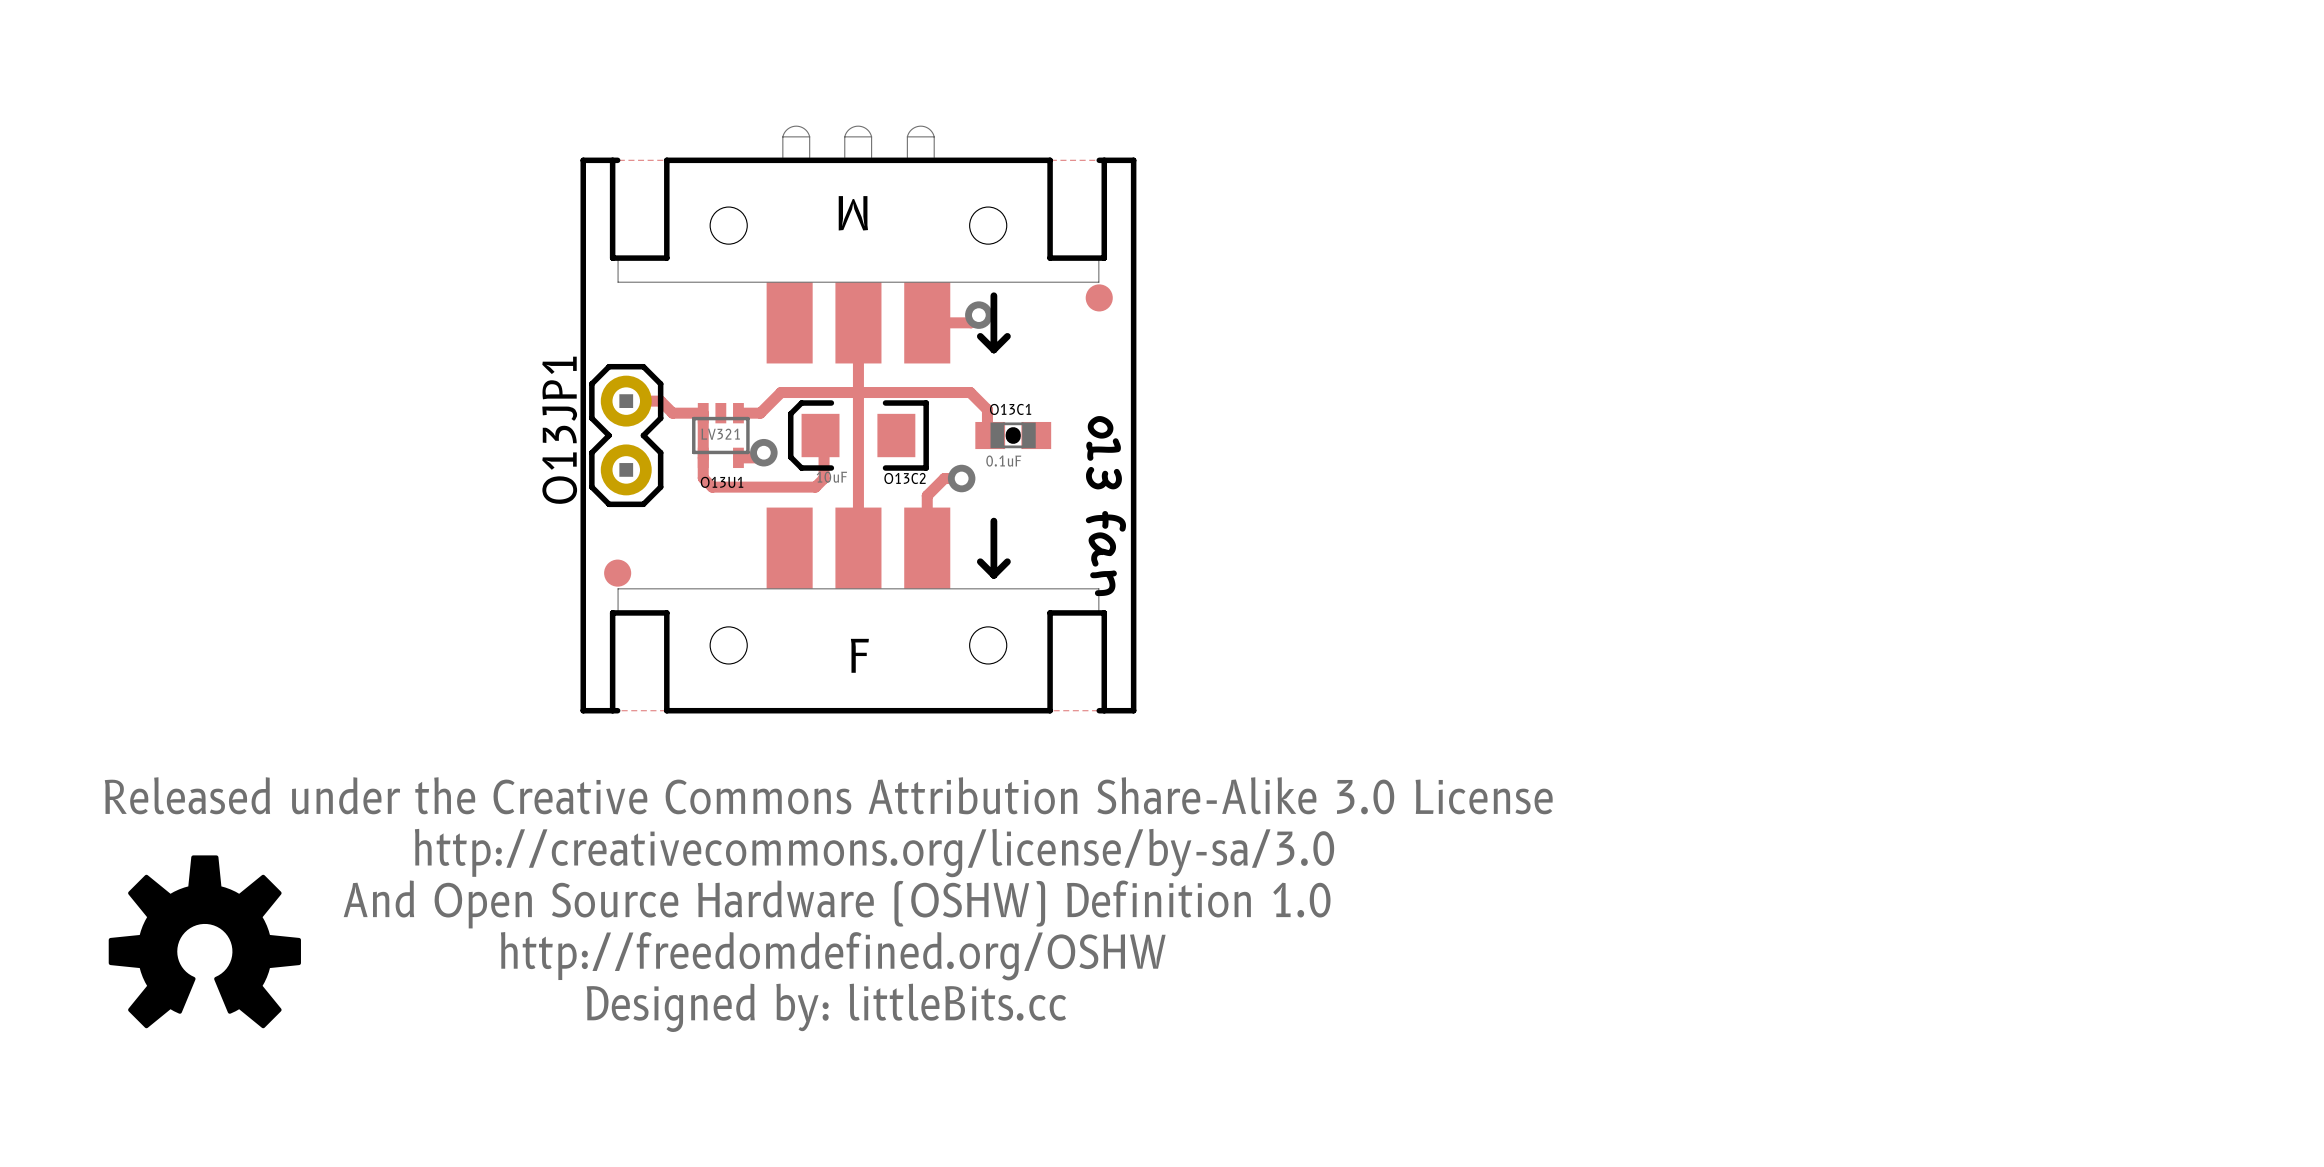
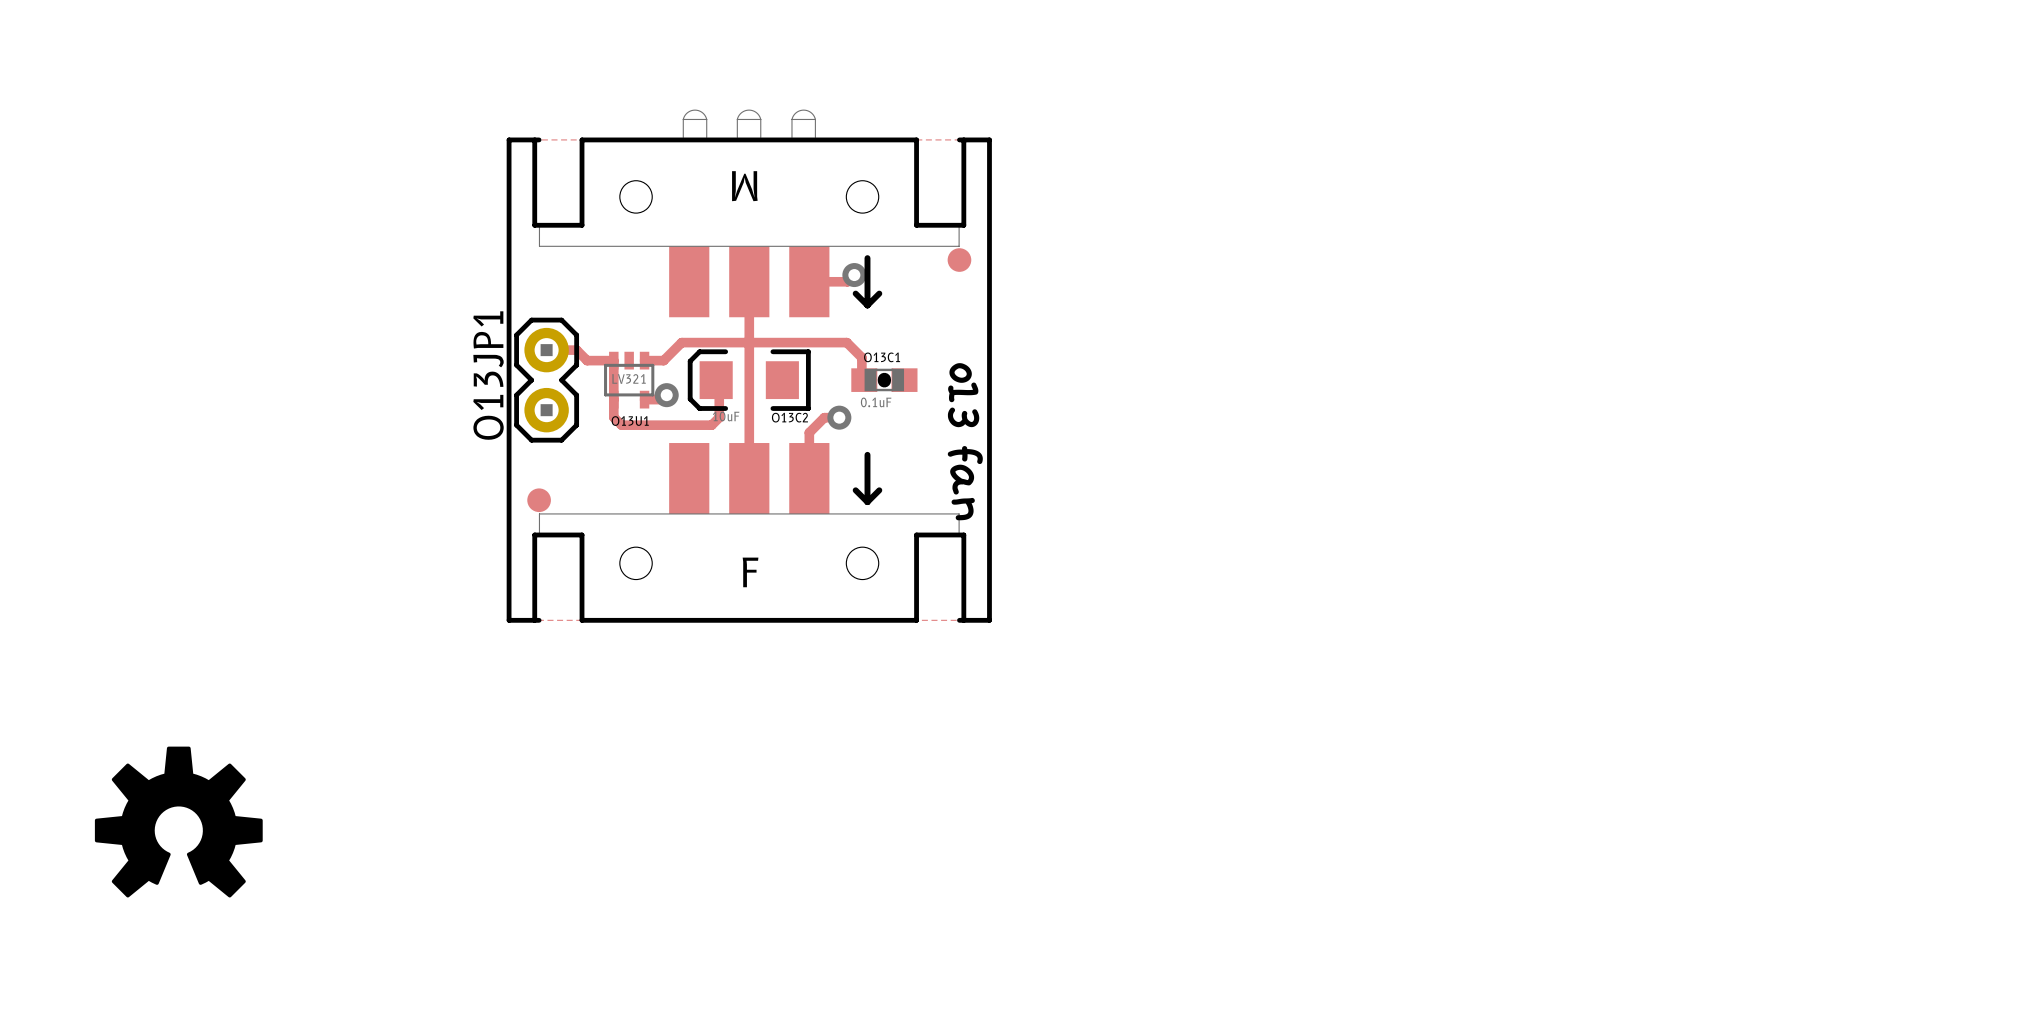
drawing: [104, 777, 1553, 1033] -> none

